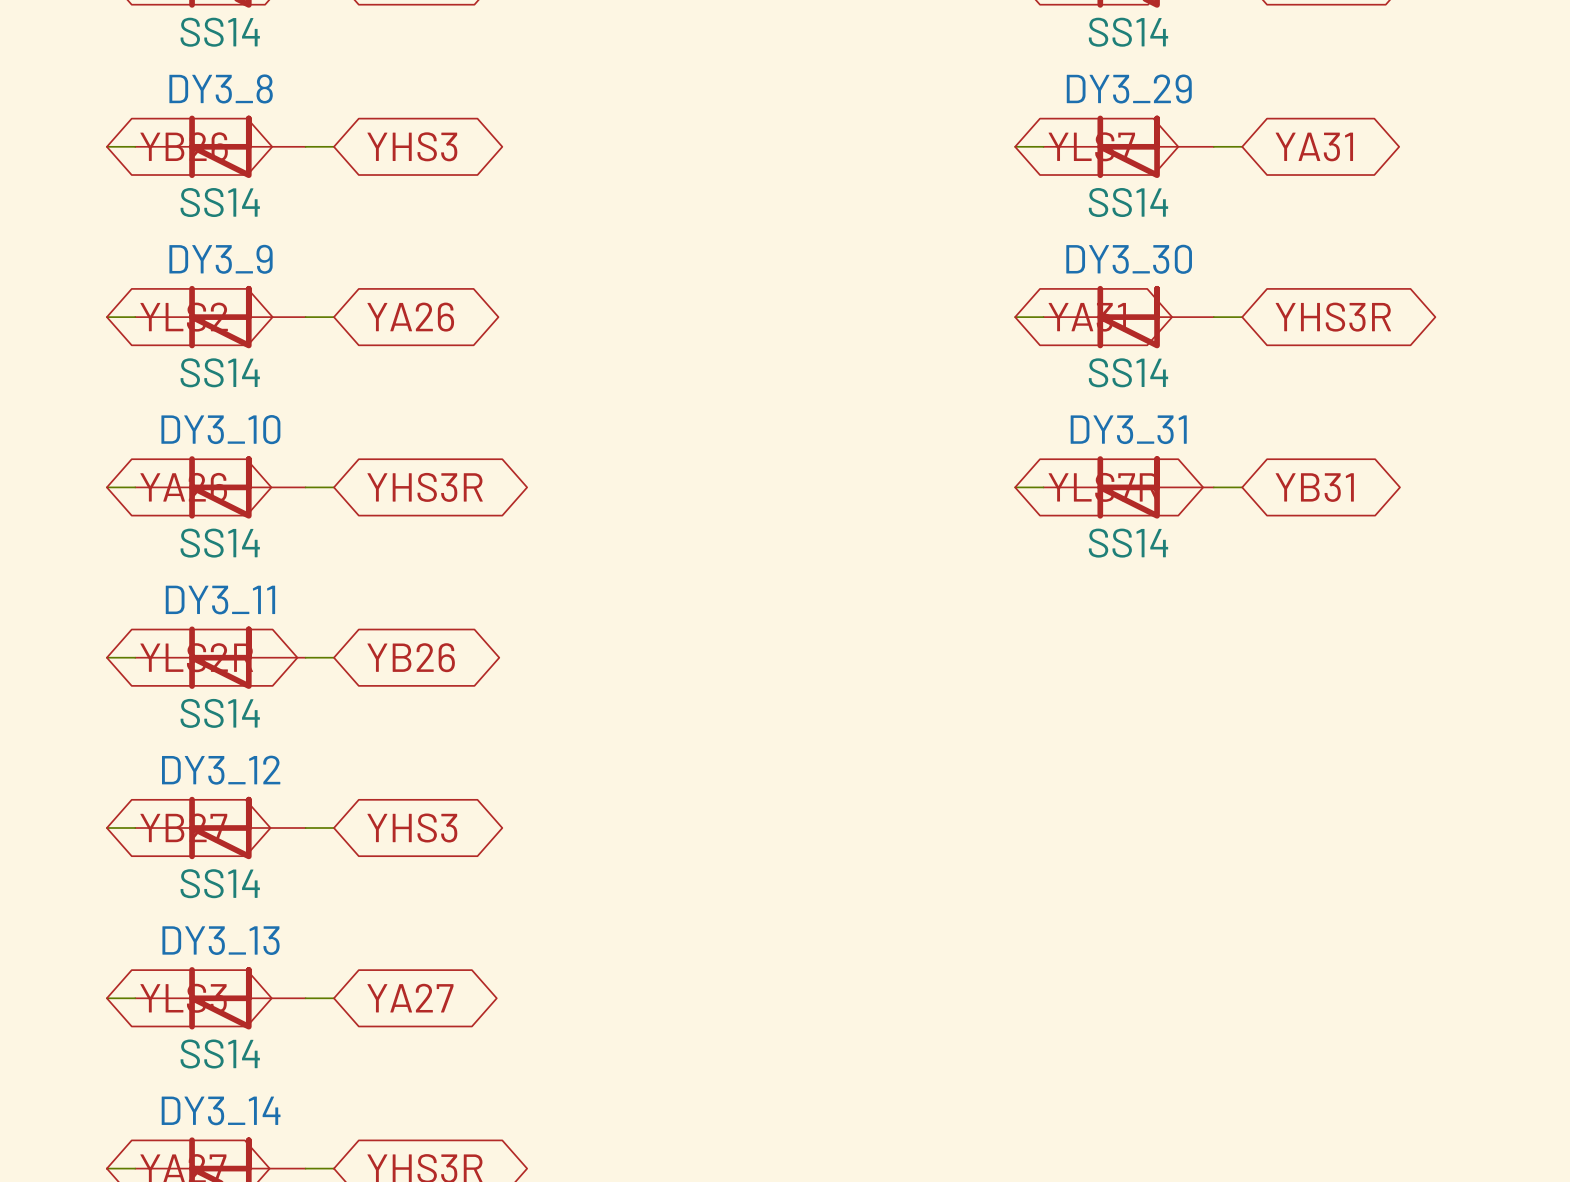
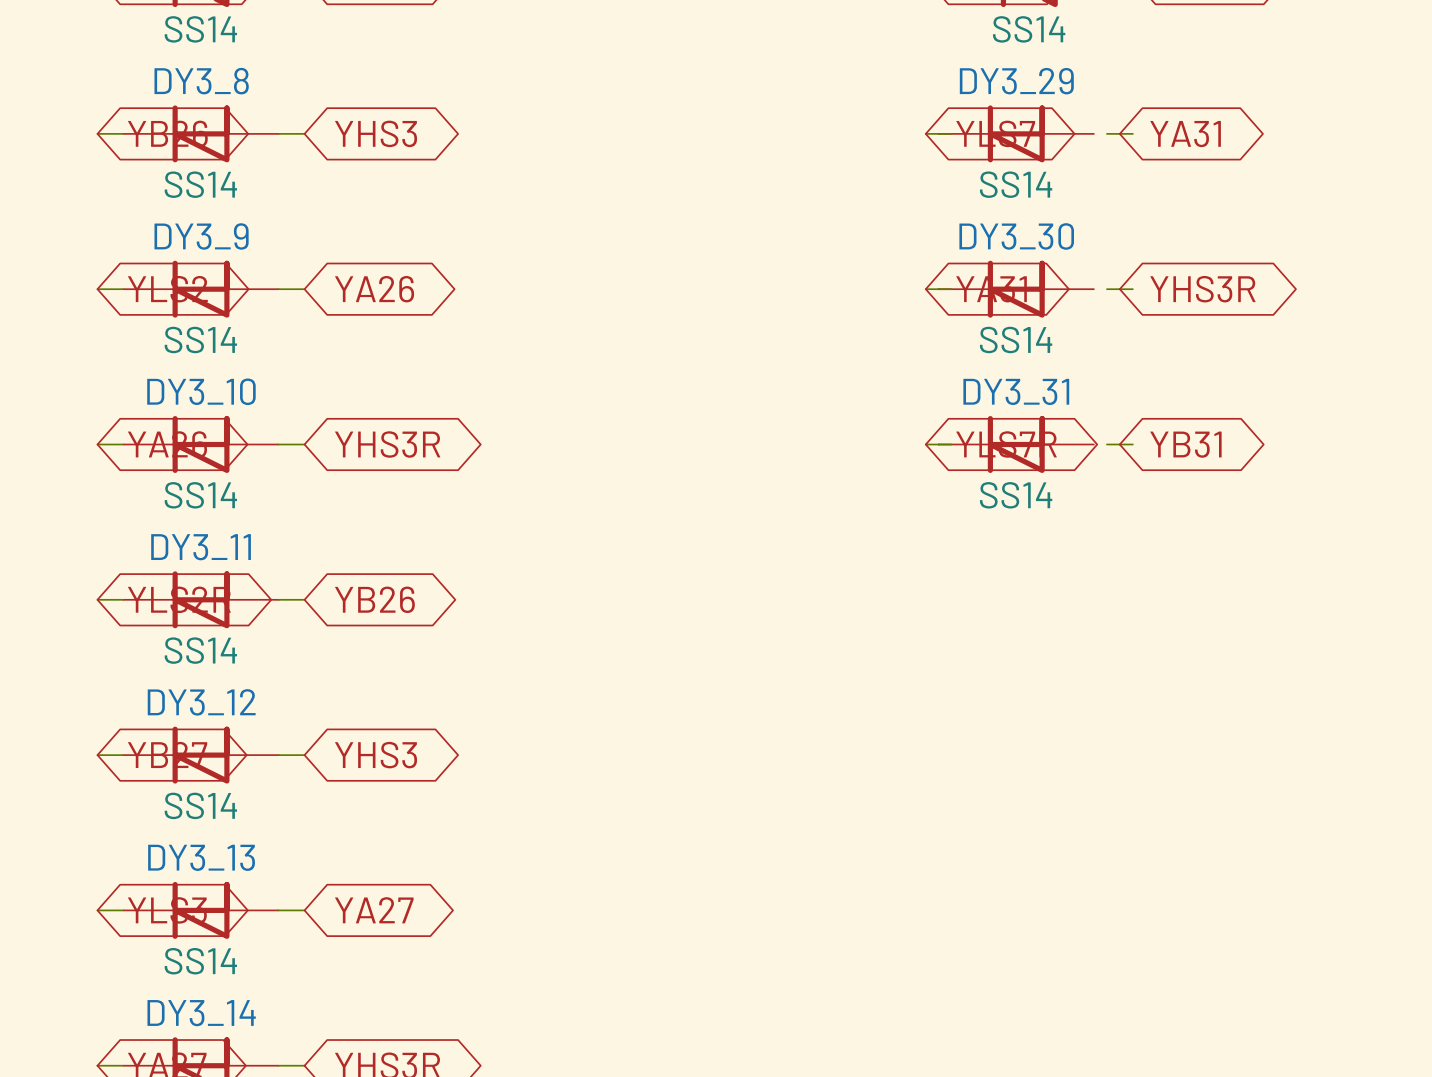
DY3_29 position: (1128, 146) -> (1016, 133)
global label position: YA31 (1314, 146) -> YA31 (1185, 134)
DY3_30 position: (1128, 317) -> (1016, 289)
global label position: YHS3R (1333, 317) -> YHS3R (1202, 289)
DY3_31 position: (1128, 487) -> (1016, 444)
global label position: YB31 (1314, 487) -> YB31 (1185, 444)

